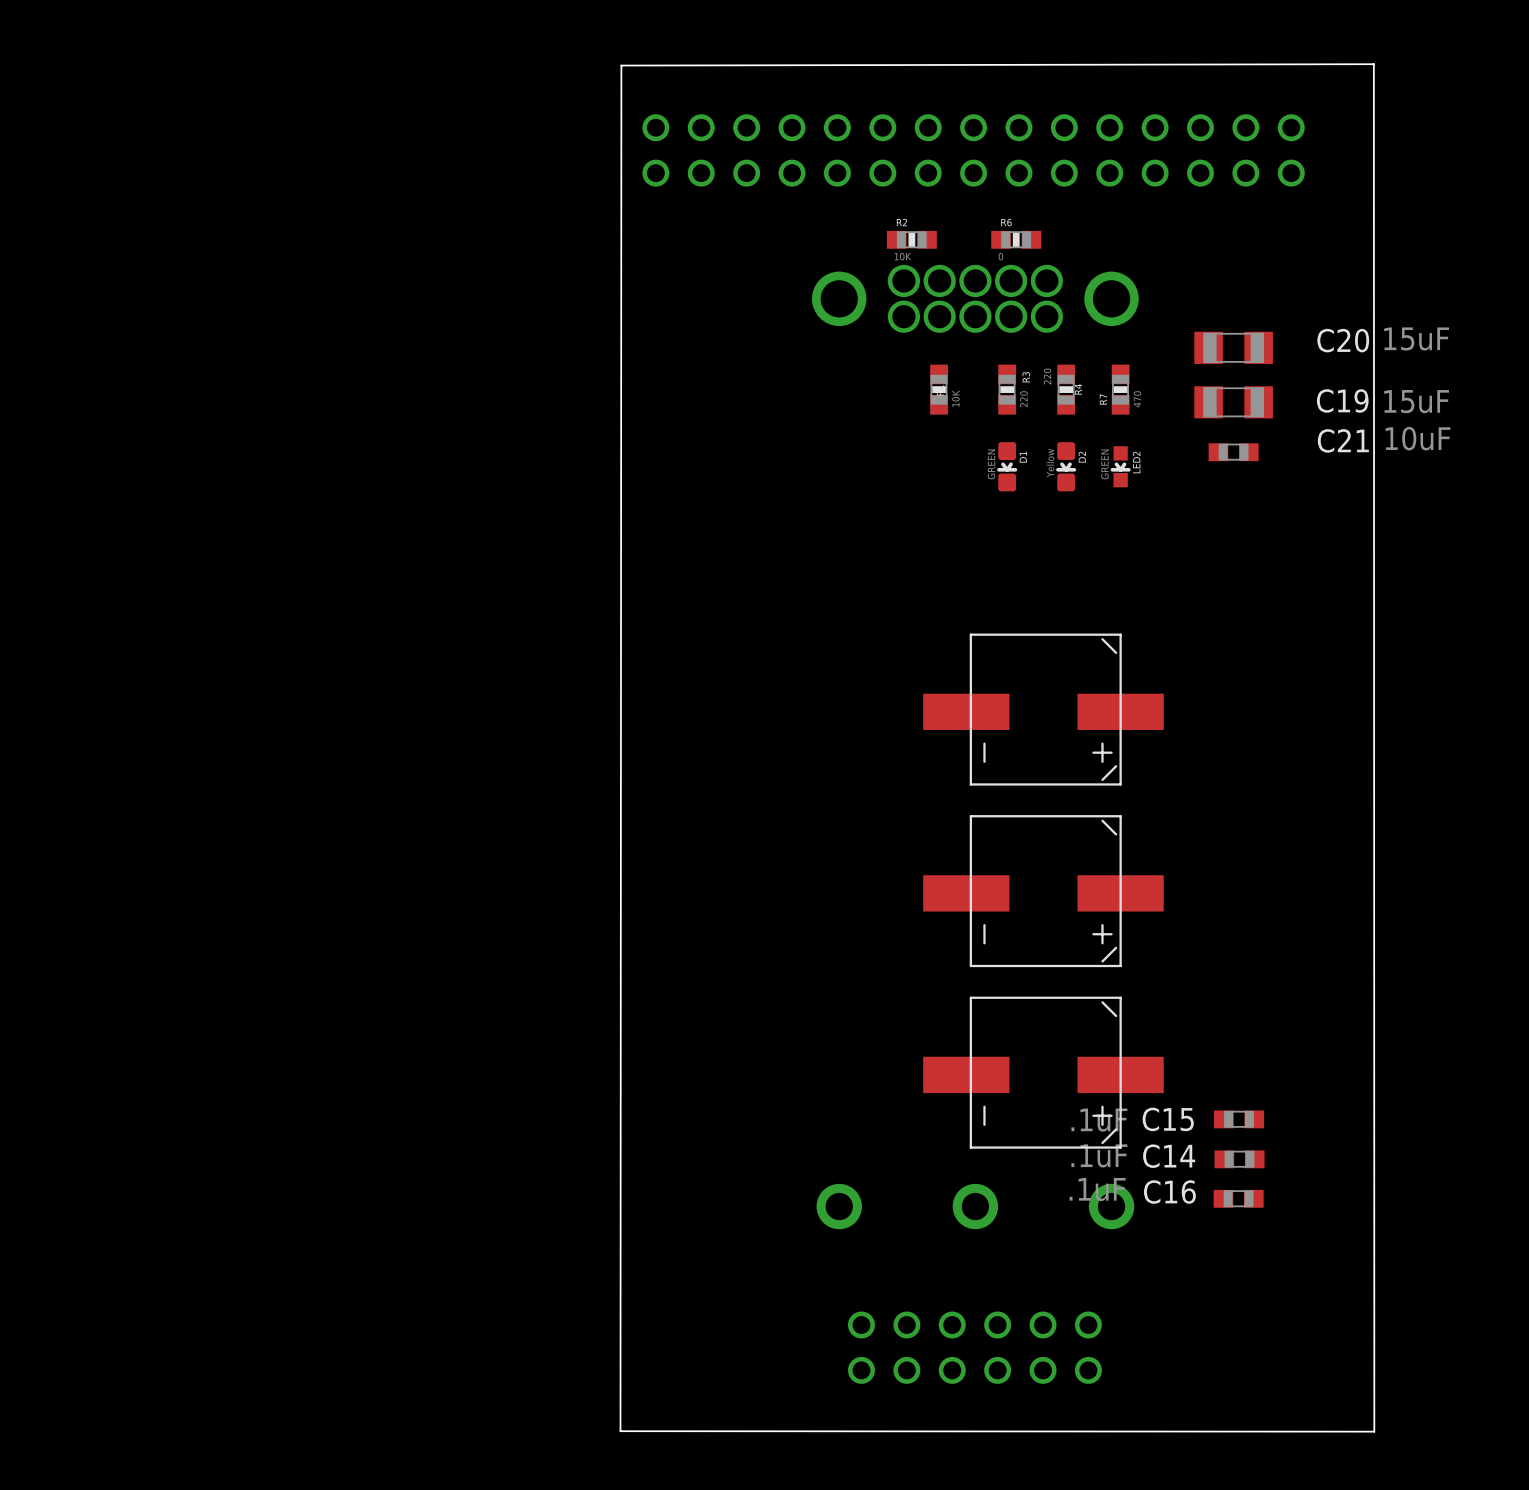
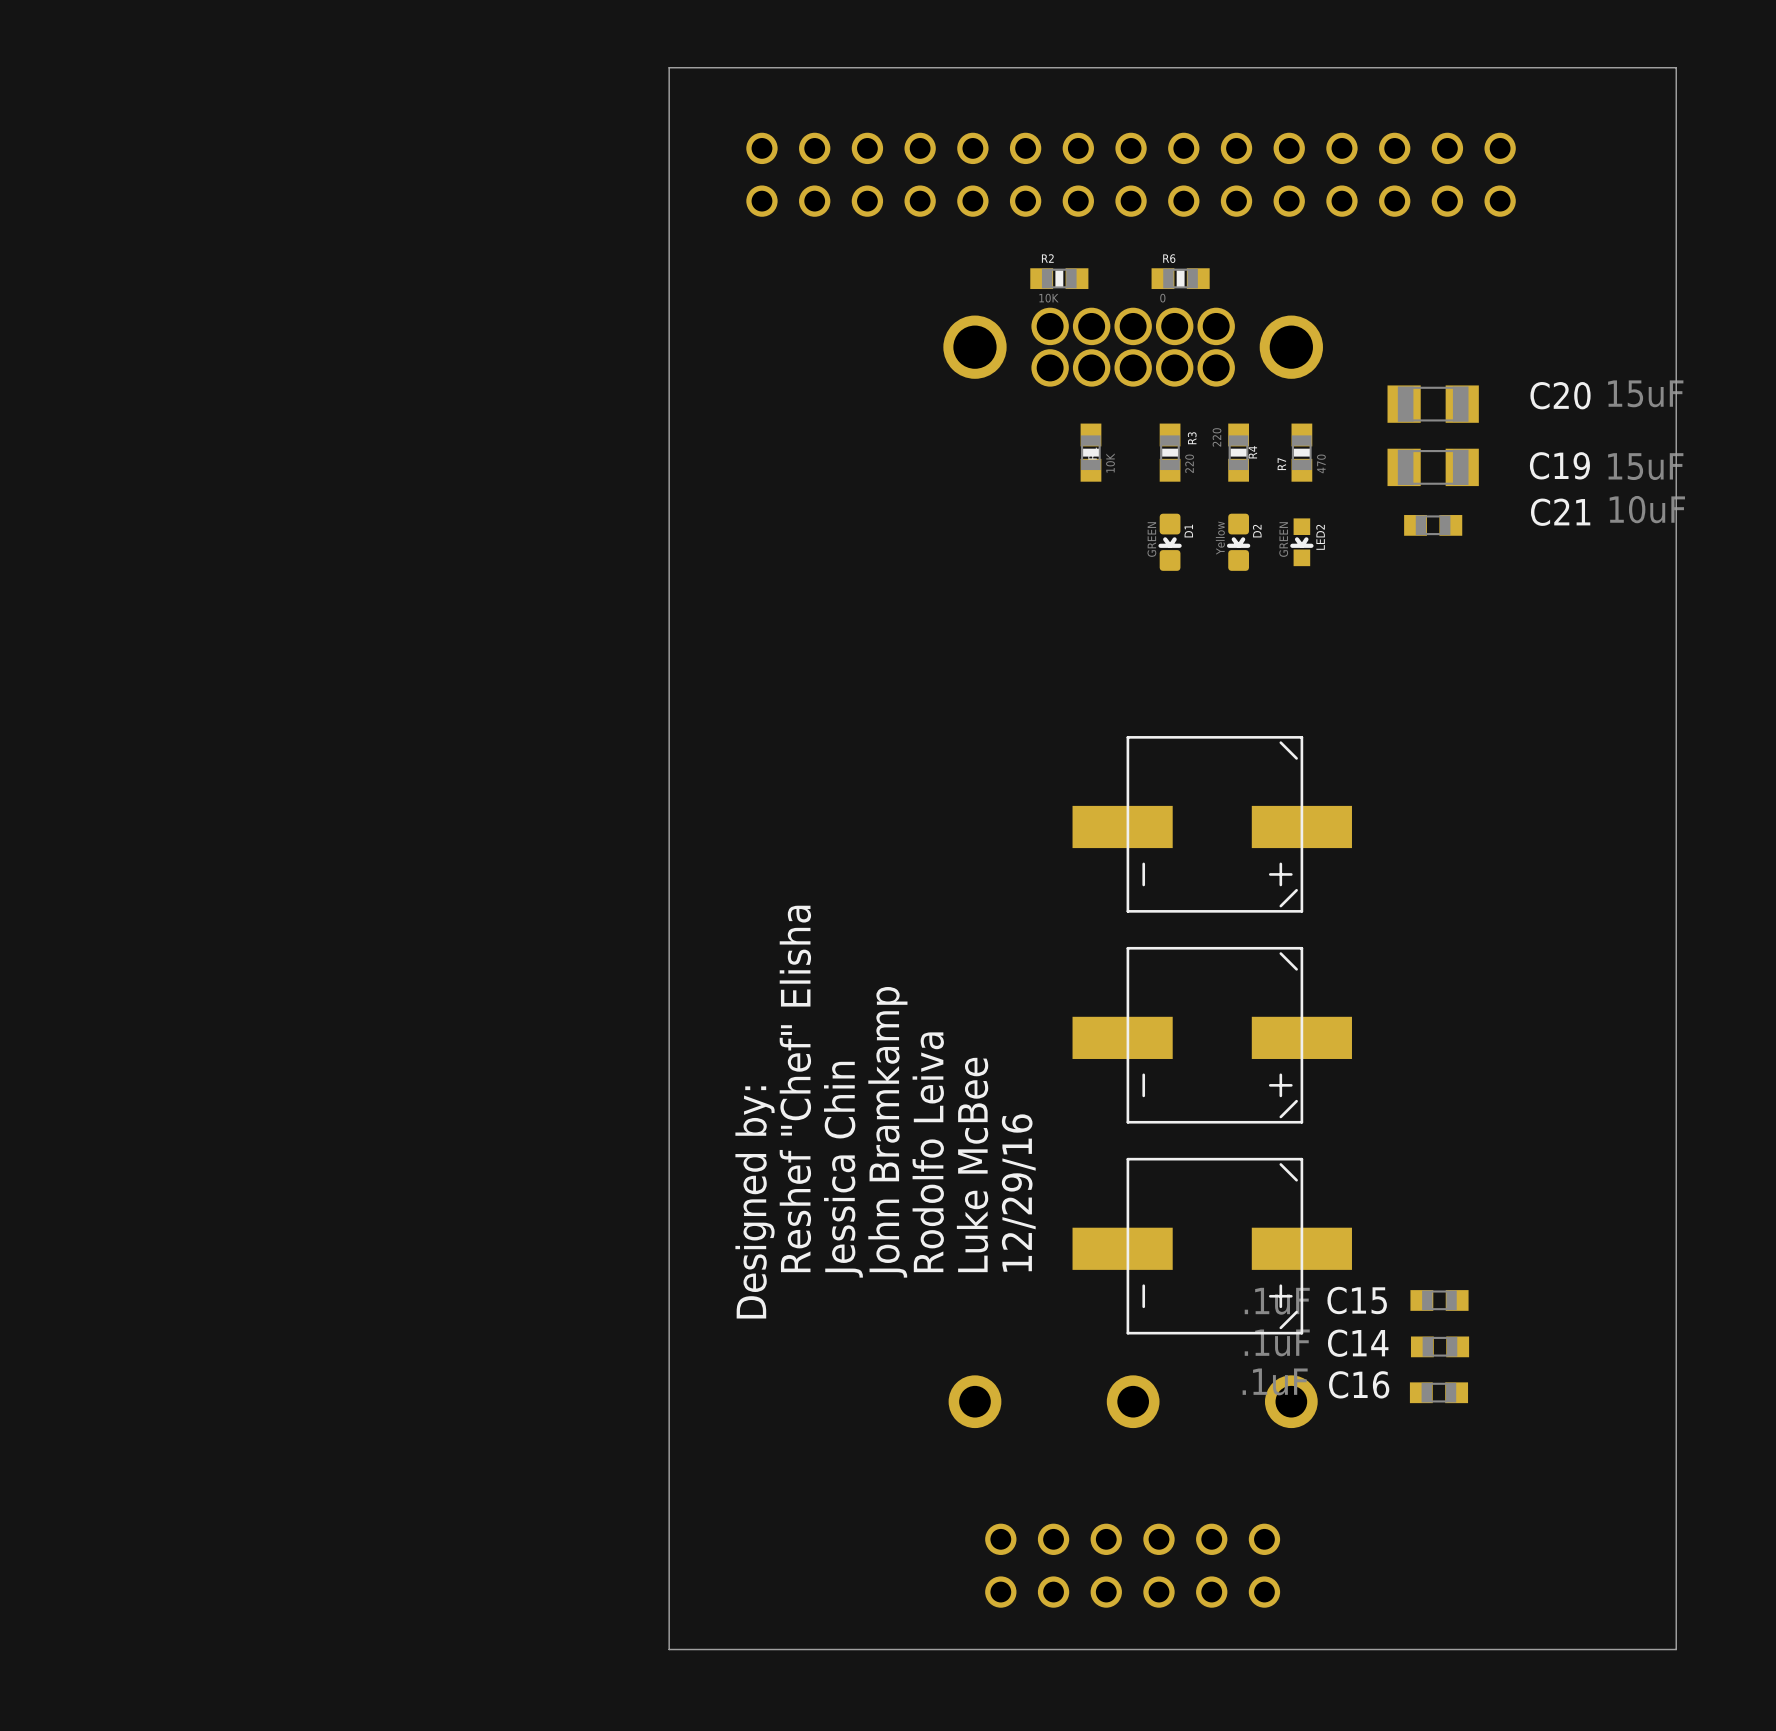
board edge: (1373, 64) (1374, 1431) (620, 1431) (621, 65) (1373, 64) -> (669, 67) (669, 1649) (1676, 1649) (1676, 67) (669, 67)
text: none -> Reshef "Chef" Elisha (795, 1088)
text: none -> John Bramkamp (887, 1132)
text: none -> Rodolfo Leiva (928, 1152)
text: none -> Luke McBee (972, 1164)
text: none -> Jessica Chin (843, 1169)
text: none -> 12/29/16 (1018, 1193)
text: none -> Designed by: (755, 1202)

